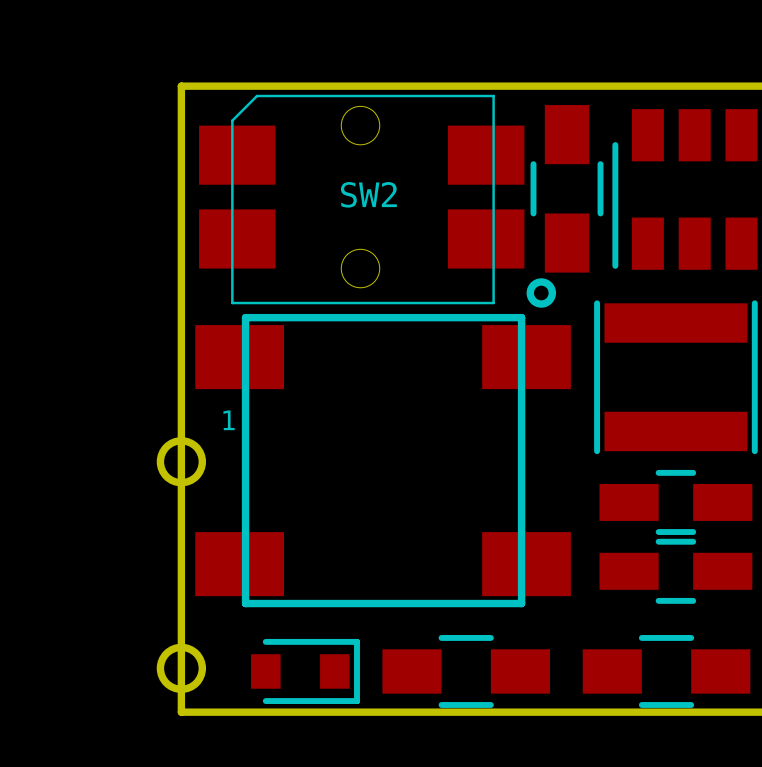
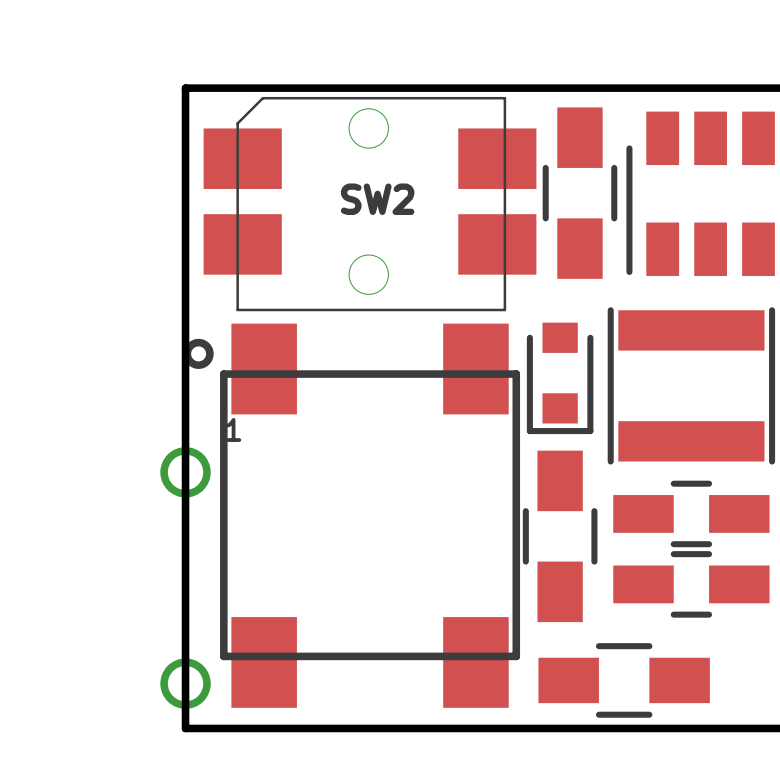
part rotation: 0° (383, 442) -> 90° counterclockwise (351, 515)
part: none -> (560, 536)
part rotation: 0° (305, 671) -> 90° clockwise (560, 378)
part position: (305, 671) -> (560, 378)
part: (466, 671) -> none
part position: (666, 671) -> (624, 680)

